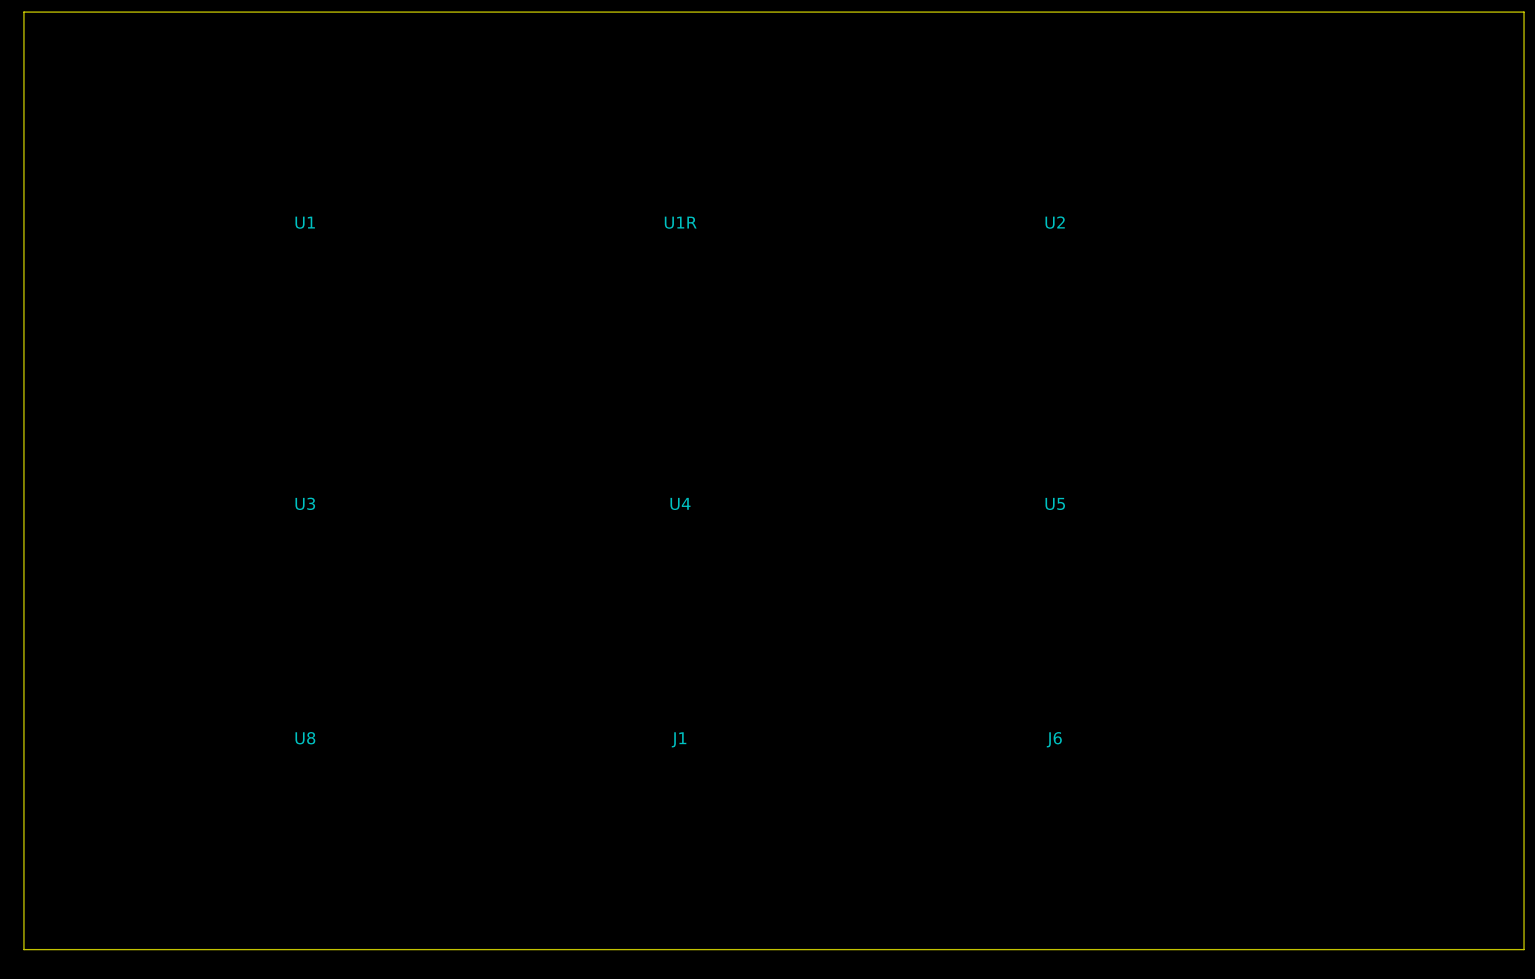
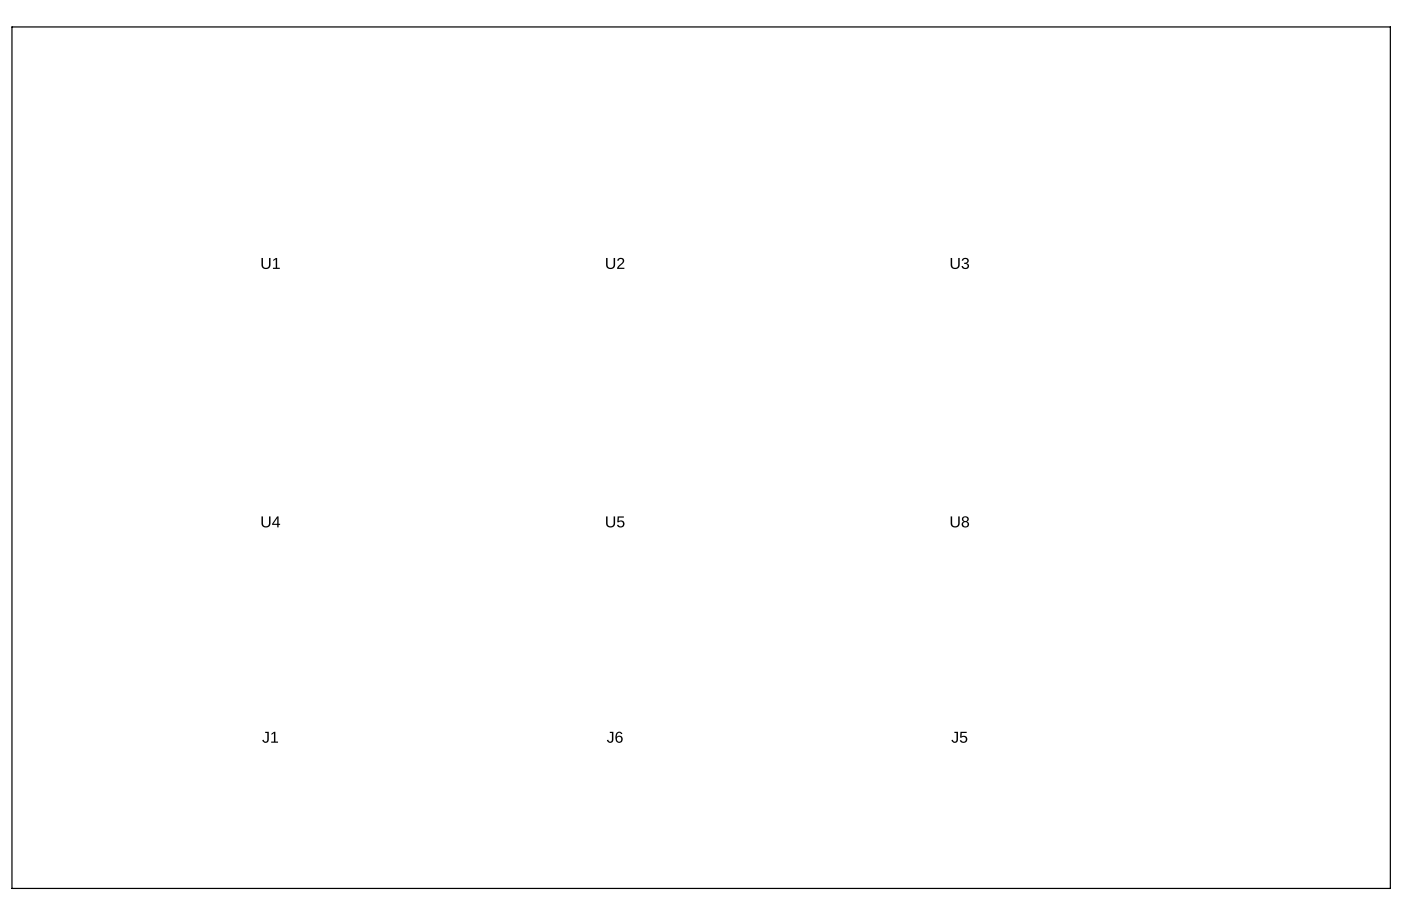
U1 position: (305, 222) -> (270, 263)
U1R: (680, 222) -> none
U2 position: (1055, 222) -> (615, 263)
U3 position: (305, 503) -> (959, 263)
U4 position: (680, 503) -> (270, 521)
U5 position: (1055, 503) -> (615, 521)
U8 position: (305, 738) -> (959, 521)
J1 position: (679, 739) -> (270, 737)
J6 position: (1054, 739) -> (614, 737)
J5: none -> (959, 737)

